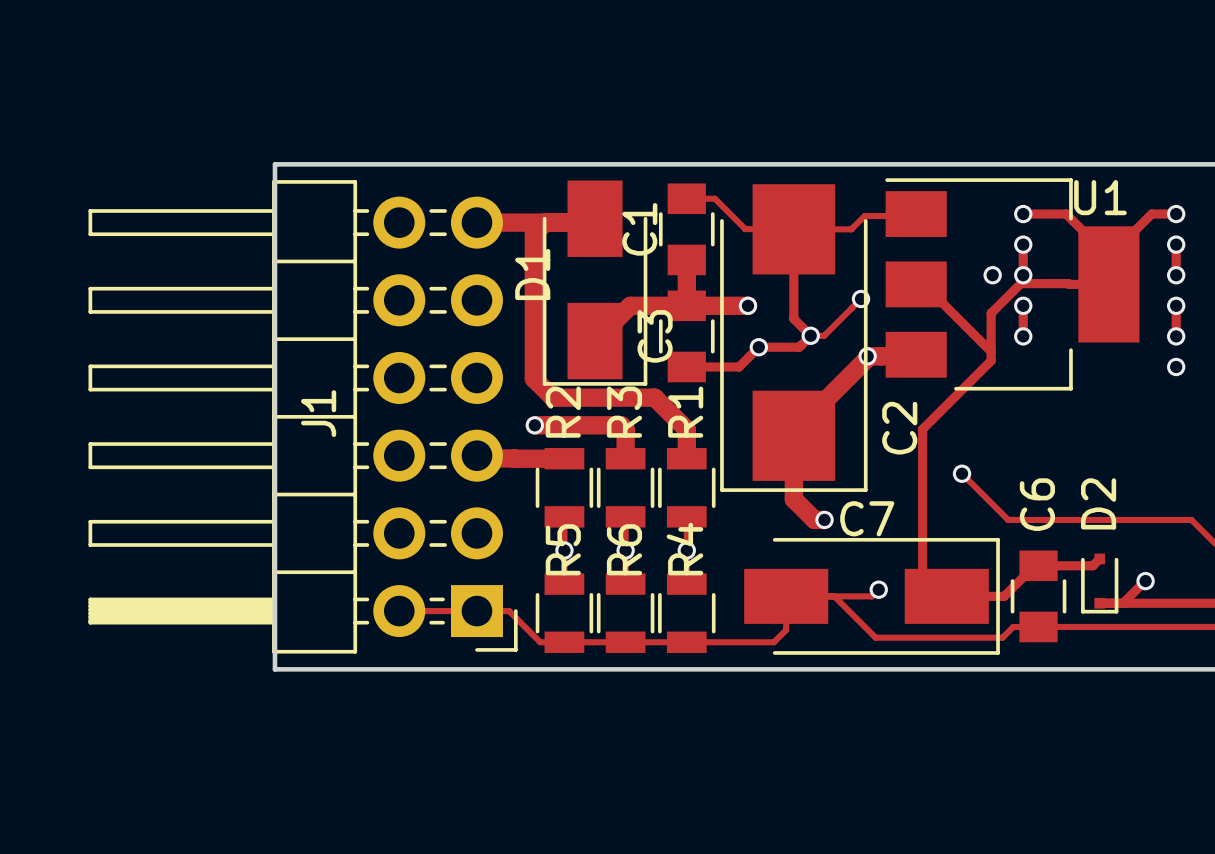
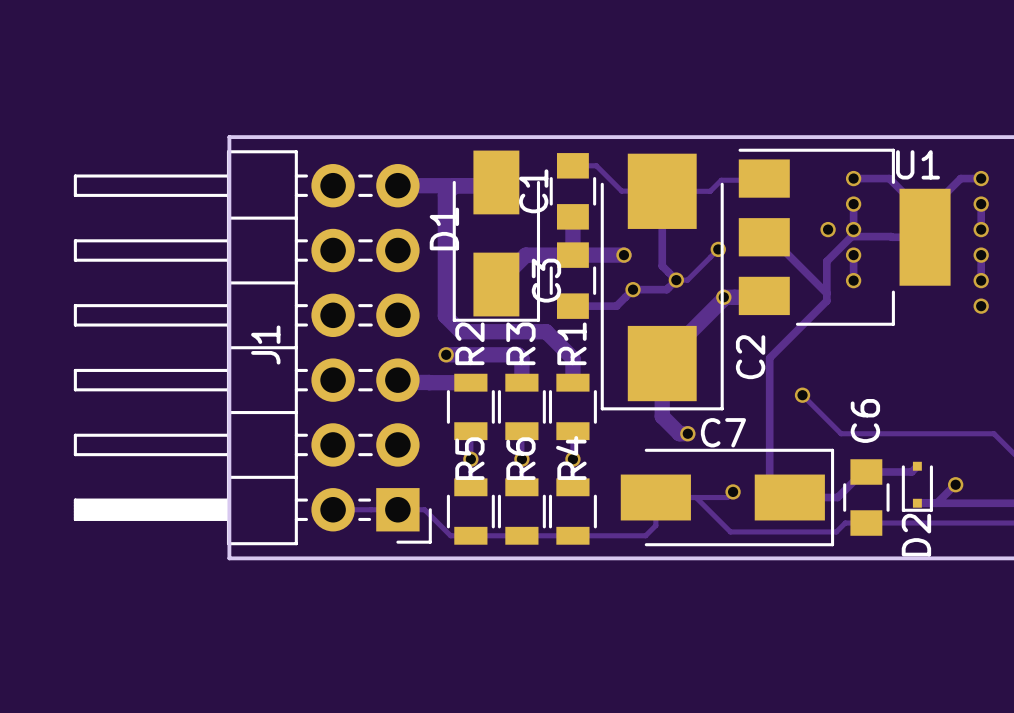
D2 name position: D2 (1098, 503) -> D2 (916, 535)

